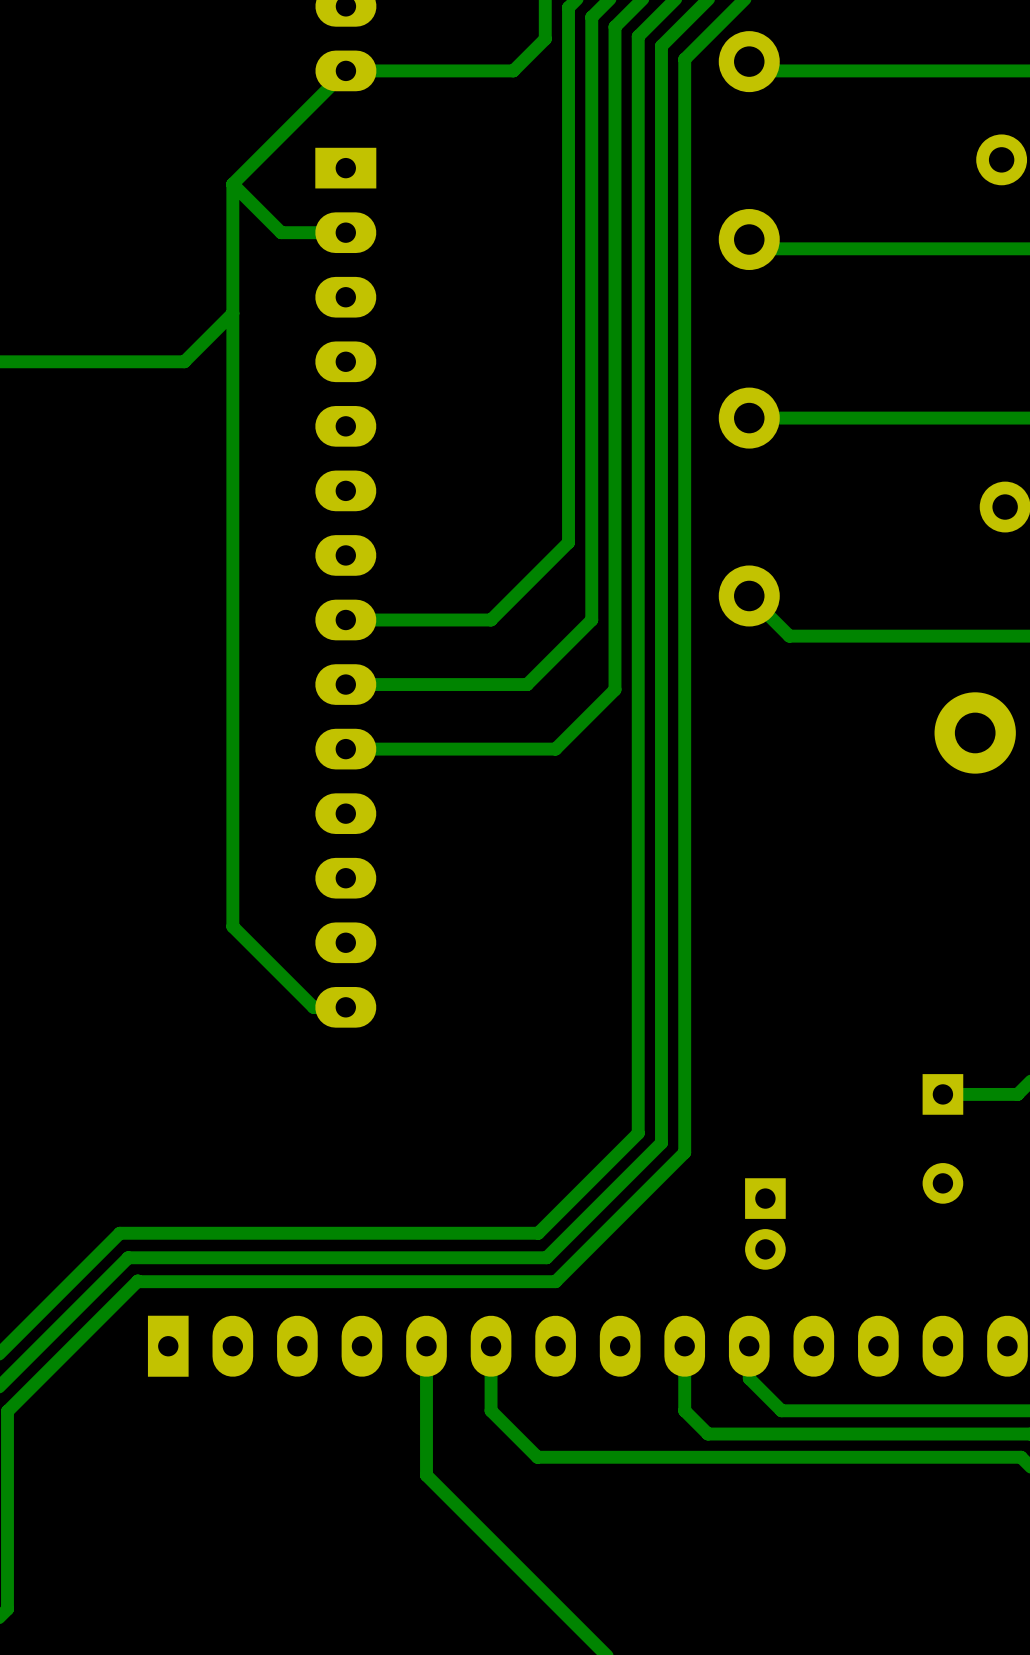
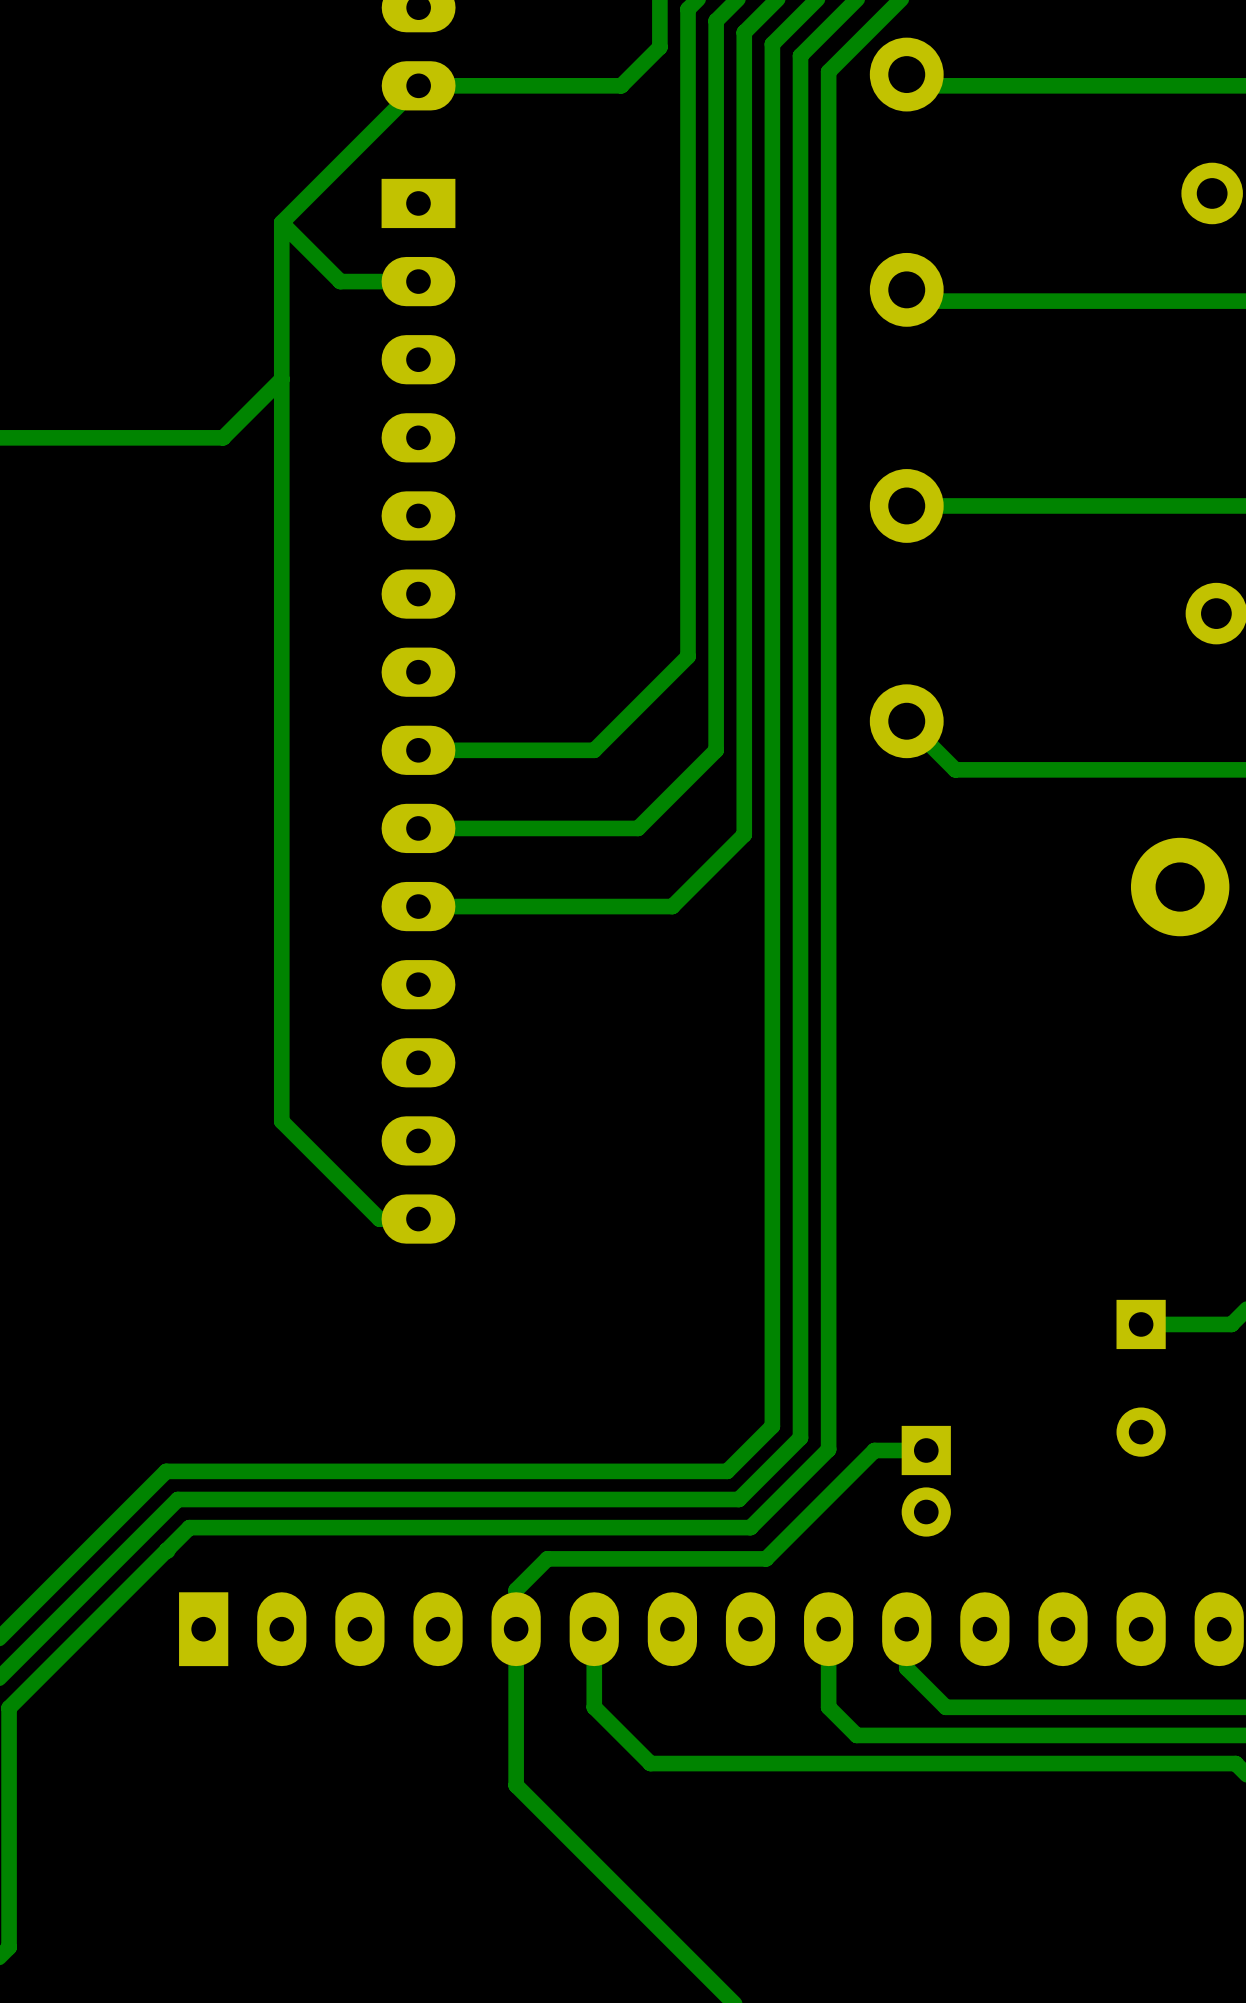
track: (638, 1133) (538, 1233) (119, 1233) -> (772, 1371) (772, 1426) (727, 1471) (166, 1471) (145, 1492)
track: (661, 1142) (546, 1257) (128, 1257) -> (800, 1383) (800, 1437) (738, 1499) (177, 1499) (155, 1522)
track: (684, 1152) (555, 1281) (138, 1281) -> (828, 1394) (828, 1449) (750, 1527) (189, 1527) (166, 1550)
track: none -> (926, 1450) (874, 1450) (766, 1558) (547, 1558) (516, 1590) (516, 1629)

